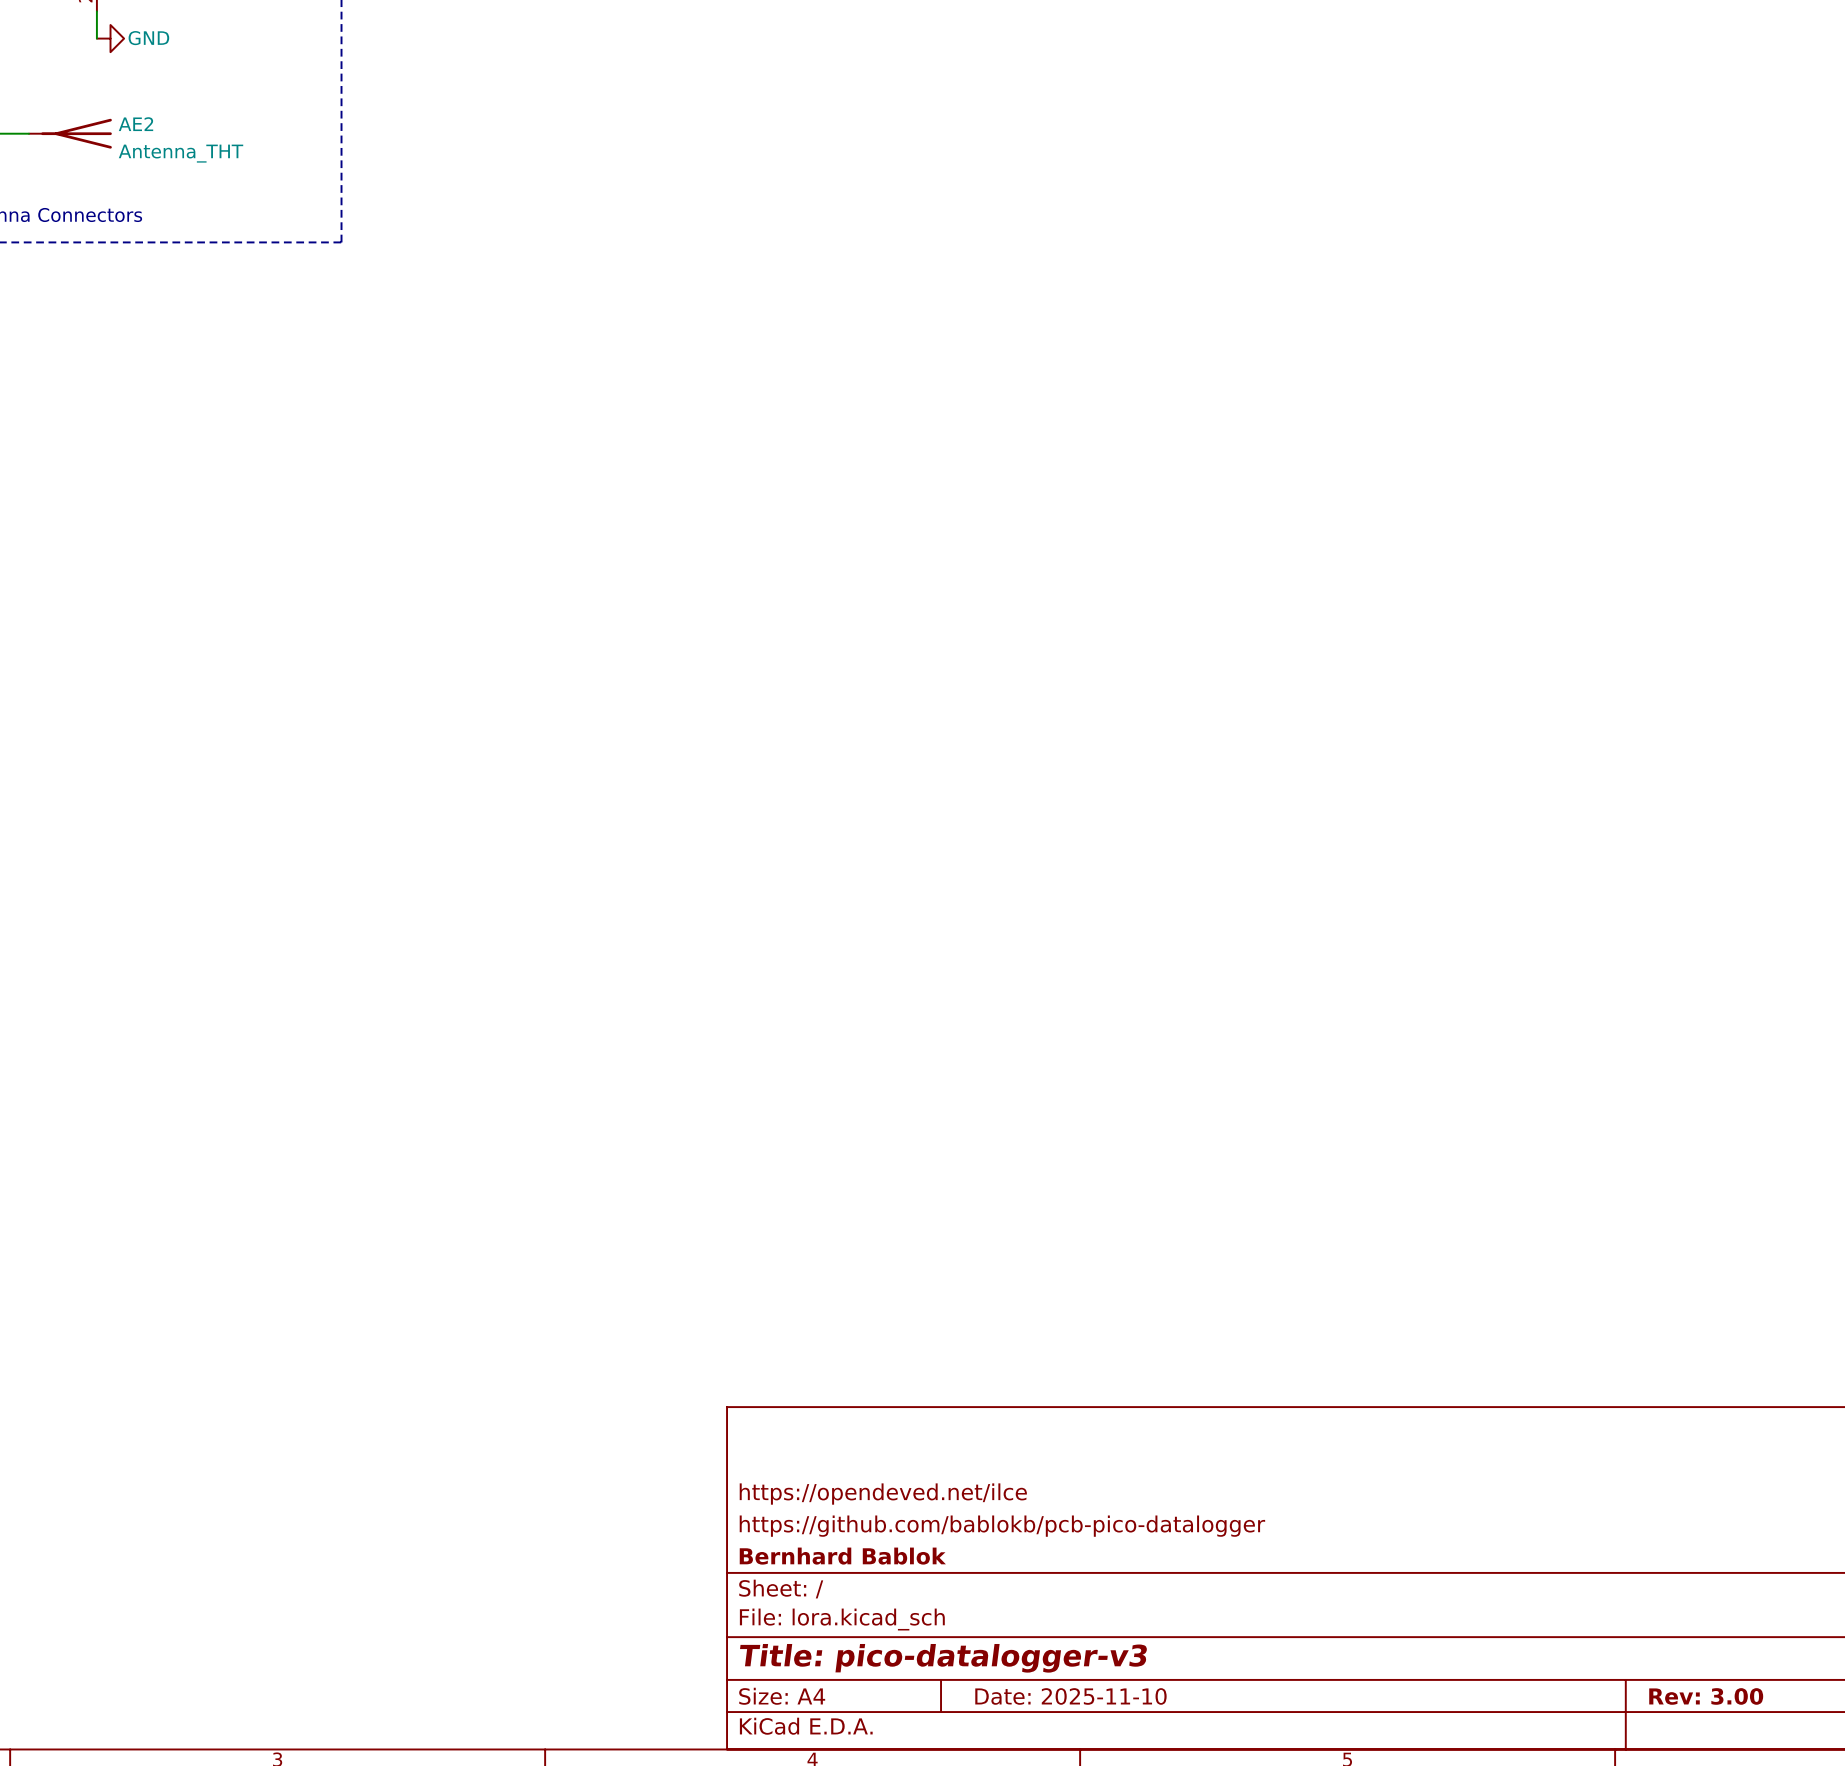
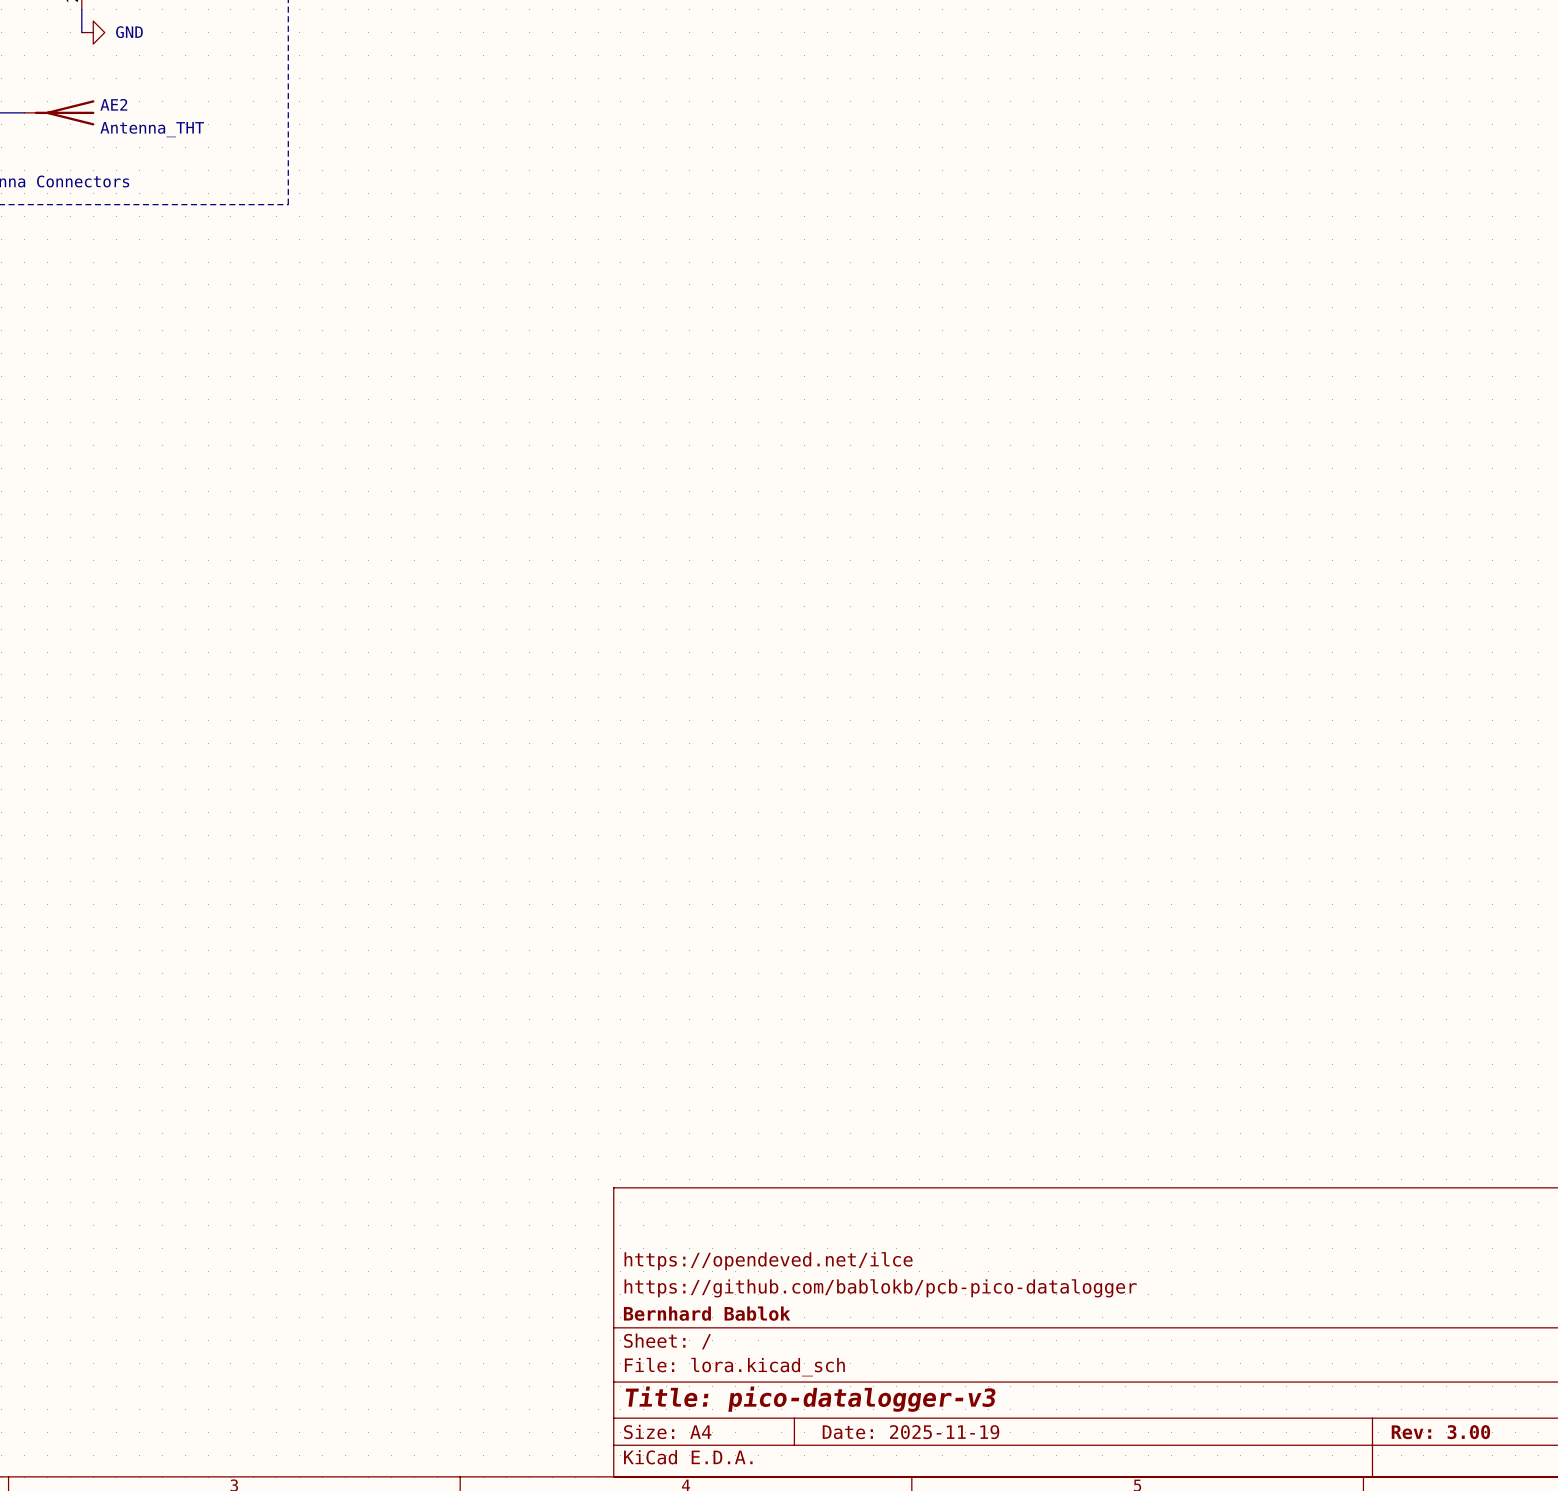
title block: Date: 2025-11-10 (1070, 1696) -> Date: 2025-11-19 (910, 1432)

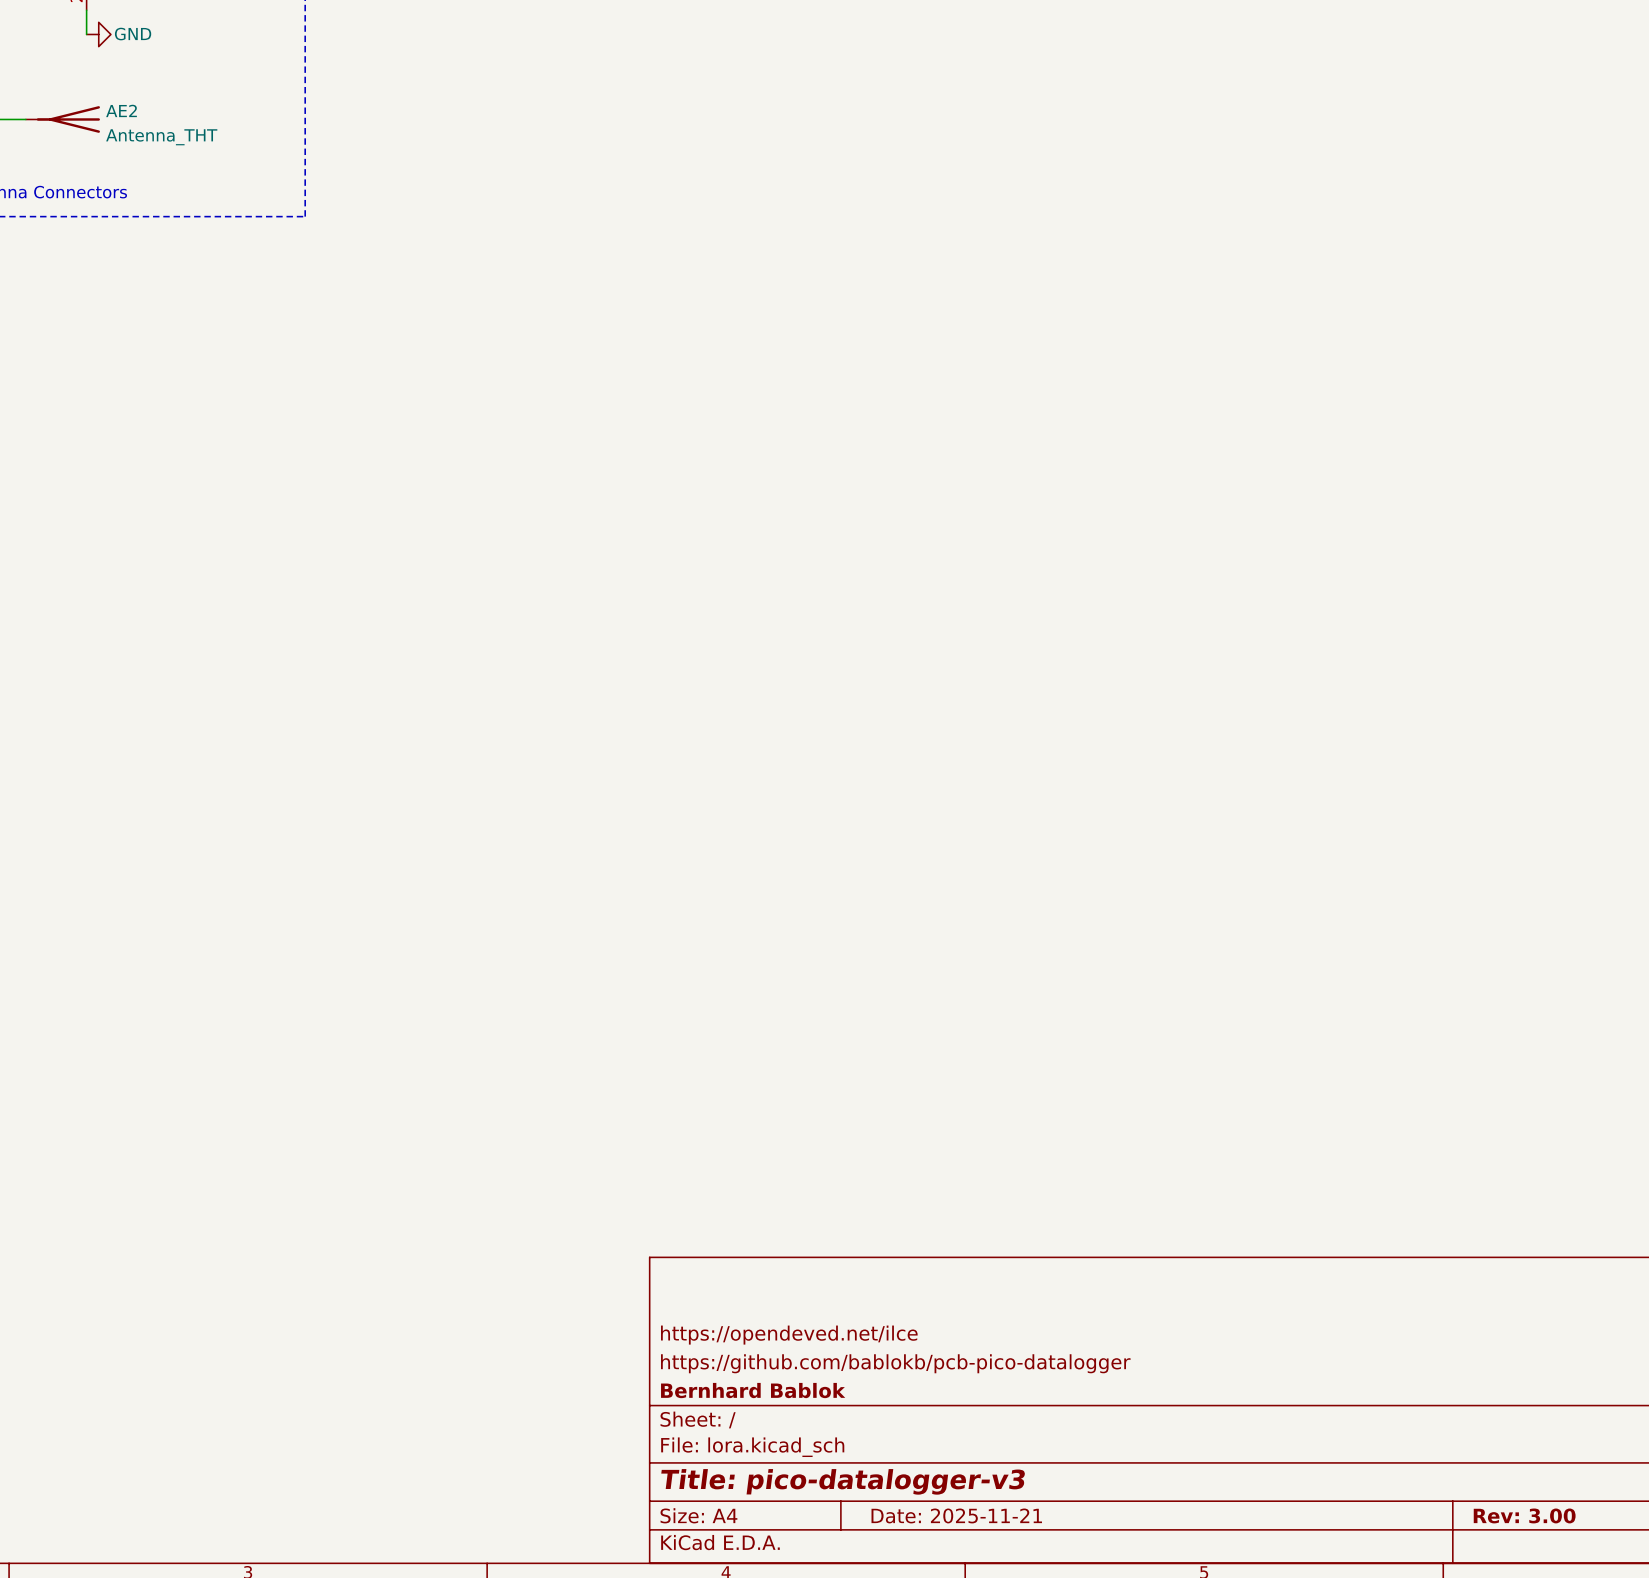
title block: Date: 2025-11-19 (910, 1432) -> Date: 2025-11-21 (956, 1515)

